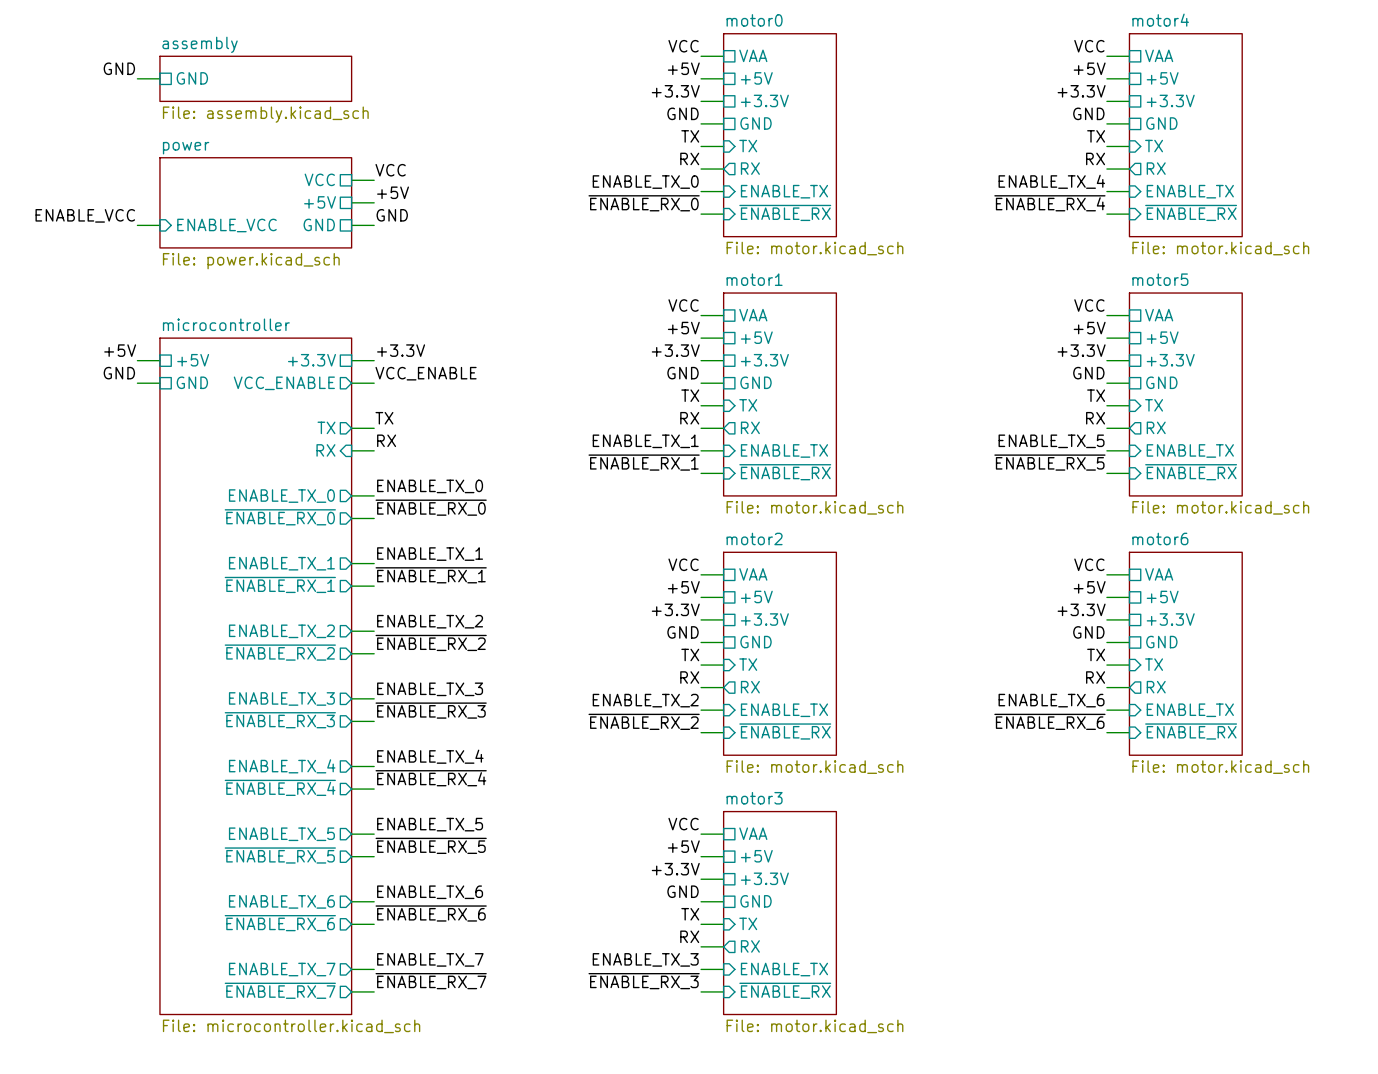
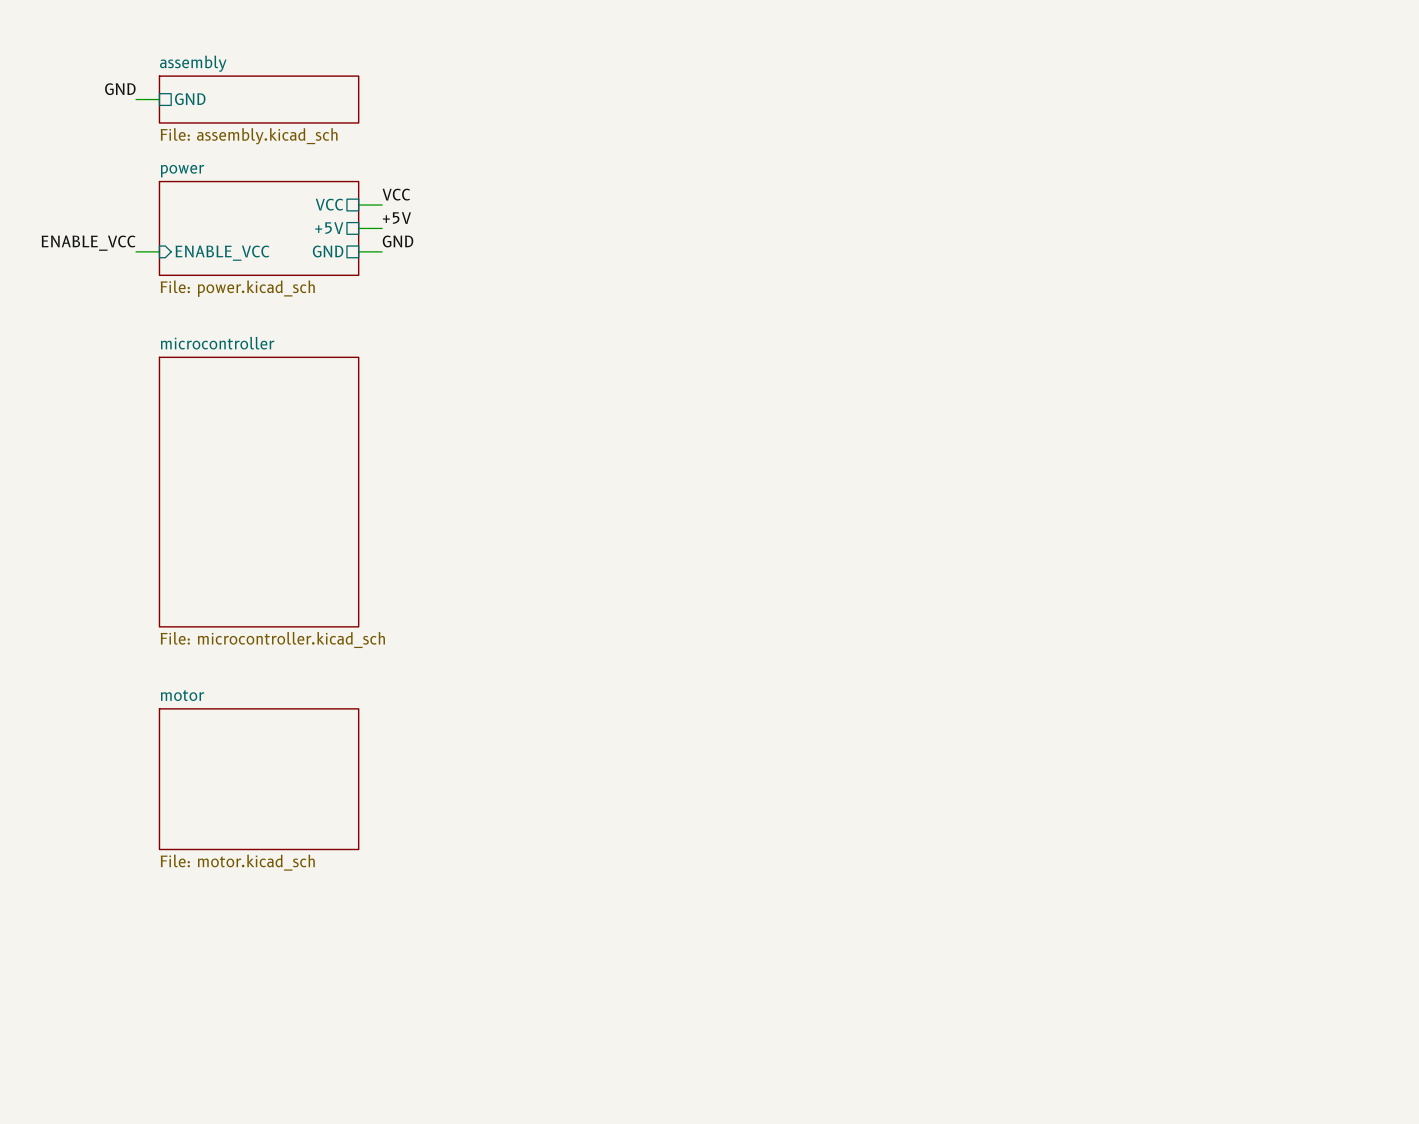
label: VCC (683, 46) -> none
label: VCC (1089, 46) -> none
sheet pin: VAA (753, 55) -> none
sheet pin: VAA (1159, 55) -> none
wire: (701, 56) (723, 56) -> none
wire: (1106, 56) (1129, 56) -> none
label: +5V (683, 68) -> none
label: +5V (1089, 68) -> none
wire: (701, 78) (723, 78) -> none
sheet pin: +5V (756, 78) -> none
wire: (1106, 78) (1129, 78) -> none
sheet pin: +5V (1162, 78) -> none
label: +3.3V (675, 91) -> none
label: +3.3V (1081, 91) -> none
sheet pin: +3.3V (764, 100) -> none
sheet pin: +3.3V (1170, 100) -> none
wire: (701, 101) (723, 101) -> none
wire: (1106, 101) (1129, 101) -> none
label: GND (683, 113) -> none
label: GND (1088, 113) -> none
wire: (701, 123) (723, 123) -> none
sheet pin: GND (756, 123) -> none
wire: (1106, 123) (1129, 123) -> none
sheet pin: GND (1161, 123) -> none
sheet motor0: File: motor.kicad_sch (779, 135) -> none
sheet motor4: File: motor.kicad_sch (1185, 135) -> none
label: TX (690, 136) -> none
label: TX (1096, 136) -> none
wire: (701, 146) (723, 146) -> none
sheet pin: TX (748, 146) -> none
wire: (1106, 146) (1129, 146) -> none
sheet pin: TX (1154, 146) -> none
label: RX (689, 158) -> none
label: RX (1095, 158) -> none
sheet pin: RX (750, 168) -> none
sheet pin: RX (1156, 168) -> none
wire: (701, 169) (723, 169) -> none
wire: (1106, 169) (1129, 169) -> none
label: ENABLE_TX_4 (1051, 181) -> none
label: ENABLE_TX_0 (645, 182) -> none
wire: (701, 191) (723, 191) -> none
sheet pin: ENABLE_TX (784, 191) -> none
wire: (1106, 191) (1129, 191) -> none
sheet pin: ENABLE_TX (1190, 191) -> none
label: ~{ENABLE_RX_0} (644, 203) -> none
label: ~{ENABLE_RX_4} (1049, 203) -> none
sheet pin: ~{ENABLE_RX} (785, 212) -> none
sheet pin: ~{ENABLE_RX} (1191, 212) -> none
wire: (701, 214) (723, 214) -> none
wire: (1106, 214) (1129, 214) -> none
label: VCC (683, 305) -> none
label: VCC (1089, 305) -> none
wire: (701, 315) (723, 315) -> none
sheet pin: VAA (753, 315) -> none
wire: (1106, 315) (1129, 315) -> none
sheet pin: VAA (1159, 315) -> none
label: +5V (683, 328) -> none
label: +5V (1089, 328) -> none
sheet pin: +5V (756, 337) -> none
sheet pin: +5V (1162, 337) -> none
wire: (701, 338) (723, 338) -> none
wire: (1106, 338) (1129, 338) -> none
label: +5V (120, 350) -> none
label: +3.3V (401, 350) -> none
label: +3.3V (675, 350) -> none
label: +3.3V (1081, 350) -> none
wire: (137, 360) (159, 360) -> none
sheet pin: +5V (193, 360) -> none
sheet pin: +3.3V (311, 360) -> none
wire: (351, 360) (374, 360) -> none
wire: (701, 360) (723, 360) -> none
sheet pin: +3.3V (764, 360) -> none
wire: (1106, 360) (1129, 360) -> none
sheet pin: +3.3V (1170, 360) -> none
label: GND (119, 373) -> none
label: VCC_ENABLE (426, 373) -> none
label: GND (683, 373) -> none
label: GND (1088, 373) -> none
sheet pin: GND (192, 382) -> none
sheet pin: GND (756, 382) -> none
sheet pin: GND (1161, 382) -> none
wire: (137, 383) (159, 383) -> none
sheet pin: VCC_ENABLE (284, 383) -> none
wire: (351, 383) (374, 383) -> none
wire: (701, 383) (723, 383) -> none
wire: (1106, 383) (1129, 383) -> none
sheet motor1: File: motor.kicad_sch (779, 394) -> none
sheet motor5: File: motor.kicad_sch (1185, 394) -> none
label: TX (690, 395) -> none
label: TX (1096, 395) -> none
wire: (701, 405) (723, 405) -> none
sheet pin: TX (748, 405) -> none
wire: (1106, 405) (1129, 405) -> none
sheet pin: TX (1154, 405) -> none
label: TX (384, 418) -> none
label: RX (689, 418) -> none
label: RX (1095, 418) -> none
sheet pin: TX (326, 427) -> none
sheet pin: RX (750, 427) -> none
sheet pin: RX (1156, 427) -> none
wire: (351, 428) (374, 428) -> none
wire: (701, 428) (723, 428) -> none
wire: (1106, 428) (1129, 428) -> none
label: RX (386, 440) -> none
label: ENABLE_TX_1 (645, 441) -> none
label: ENABLE_TX_5 (1051, 441) -> none
sheet pin: RX (325, 450) -> none
wire: (351, 450) (374, 450) -> none
wire: (701, 450) (723, 450) -> none
sheet pin: ENABLE_TX (784, 450) -> none
wire: (1106, 450) (1129, 450) -> none
sheet pin: ENABLE_TX (1190, 450) -> none
sheet microcontroller: none -> File: microcontroller.kicad_sch (259, 492)
label: ~{ENABLE_RX_1} (644, 462) -> none
label: ~{ENABLE_RX_5} (1049, 462) -> none
sheet pin: ~{ENABLE_RX} (785, 472) -> none
sheet pin: ~{ENABLE_RX} (1191, 472) -> none
wire: (701, 473) (723, 473) -> none
wire: (1106, 473) (1129, 473) -> none
label: ENABLE_TX_0 (430, 486) -> none
wire: (351, 495) (374, 495) -> none
sheet pin: ENABLE_TX_0 (281, 496) -> none
label: ~{ENABLE_RX_0} (431, 507) -> none
sheet pin: ~{ENABLE_RX_0} (280, 517) -> none
wire: (351, 518) (374, 518) -> none
label: ENABLE_TX_1 (430, 554) -> none
sheet pin: ENABLE_TX_1 (281, 563) -> none
wire: (351, 563) (374, 563) -> none
label: VCC (683, 564) -> none
label: VCC (1089, 564) -> none
wire: (701, 574) (723, 574) -> none
sheet pin: VAA (753, 574) -> none
wire: (1106, 574) (1129, 574) -> none
sheet pin: VAA (1159, 574) -> none
label: ~{ENABLE_RX_1} (431, 575) -> none
sheet pin: ~{ENABLE_RX_1} (280, 584) -> none
wire: (351, 586) (374, 586) -> none
label: +5V (683, 587) -> none
label: +5V (1089, 587) -> none
sheet pin: +5V (756, 596) -> none
sheet pin: +5V (1162, 596) -> none
wire: (701, 597) (723, 597) -> none
wire: (1106, 597) (1129, 597) -> none
label: +3.3V (675, 609) -> none
label: +3.3V (1081, 609) -> none
wire: (701, 619) (723, 619) -> none
sheet pin: +3.3V (764, 619) -> none
wire: (1106, 619) (1129, 619) -> none
sheet pin: +3.3V (1170, 619) -> none
label: ENABLE_TX_2 (430, 621) -> none
sheet pin: ENABLE_TX_2 (281, 631) -> none
wire: (351, 631) (374, 631) -> none
label: GND (683, 632) -> none
label: GND (1088, 632) -> none
label: ~{ENABLE_RX_2} (431, 642) -> none
wire: (701, 642) (723, 642) -> none
sheet pin: GND (756, 642) -> none
wire: (1106, 642) (1129, 642) -> none
sheet pin: GND (1161, 642) -> none
sheet pin: ~{ENABLE_RX_2} (280, 652) -> none
wire: (351, 653) (374, 653) -> none
sheet motor2: File: motor.kicad_sch (779, 653) -> none
sheet motor6: File: motor.kicad_sch (1185, 653) -> none
label: TX (690, 654) -> none
label: TX (1096, 654) -> none
sheet pin: TX (748, 664) -> none
sheet pin: TX (1154, 664) -> none
wire: (701, 665) (723, 665) -> none
wire: (1106, 665) (1129, 665) -> none
sheet microcontroller: File: microcontroller.kicad_sch (255, 676) -> none
label: RX (689, 677) -> none
label: RX (1095, 677) -> none
wire: (701, 687) (723, 687) -> none
sheet pin: RX (750, 687) -> none
wire: (1106, 687) (1129, 687) -> none
sheet pin: RX (1156, 687) -> none
label: ENABLE_TX_3 (430, 689) -> none
sheet pin: ENABLE_TX_3 (281, 698) -> none
wire: (351, 698) (374, 698) -> none
label: ENABLE_TX_2 (645, 700) -> none
label: ENABLE_TX_6 (1051, 700) -> none
label: ~{ENABLE_RX_3} (431, 710) -> none
wire: (701, 710) (723, 710) -> none
sheet pin: ENABLE_TX (784, 710) -> none
wire: (1106, 710) (1129, 710) -> none
sheet pin: ENABLE_TX (1190, 710) -> none
sheet pin: ~{ENABLE_RX_3} (280, 720) -> none
wire: (351, 721) (374, 721) -> none
label: ~{ENABLE_RX_2} (644, 721) -> none
label: ~{ENABLE_RX_6} (1049, 721) -> none
sheet pin: ~{ENABLE_RX} (785, 731) -> none
sheet pin: ~{ENABLE_RX} (1191, 731) -> none
sheet motor: none -> File: motor.kicad_sch (259, 779)
wire: (701, 732) (723, 732) -> none
wire: (1106, 732) (1129, 732) -> none
label: ENABLE_TX_4 (430, 756) -> none
sheet pin: ENABLE_TX_4 (282, 766) -> none
wire: (351, 766) (374, 766) -> none
label: ~{ENABLE_RX_4} (431, 778) -> none
sheet pin: ~{ENABLE_RX_4} (280, 787) -> none
wire: (351, 789) (374, 789) -> none
label: ENABLE_TX_5 (430, 824) -> none
label: VCC (683, 824) -> none
sheet pin: VAA (753, 833) -> none
sheet pin: ENABLE_TX_5 (281, 834) -> none
wire: (351, 834) (374, 834) -> none
wire: (701, 834) (723, 834) -> none
label: ~{ENABLE_RX_5} (431, 845) -> none
label: +5V (683, 846) -> none
sheet pin: ~{ENABLE_RX_5} (280, 855) -> none
wire: (351, 856) (374, 856) -> none
wire: (701, 856) (723, 856) -> none
sheet pin: +5V (756, 856) -> none
label: +3.3V (675, 869) -> none
sheet pin: +3.3V (764, 878) -> none
wire: (701, 879) (723, 879) -> none
label: GND (683, 891) -> none
label: ENABLE_TX_6 (430, 892) -> none
sheet pin: ENABLE_TX_6 (281, 901) -> none
wire: (351, 901) (374, 901) -> none
wire: (701, 901) (723, 901) -> none
sheet pin: GND (756, 901) -> none
label: ~{ENABLE_RX_6} (431, 913) -> none
sheet motor3: File: motor.kicad_sch (779, 913) -> none
label: TX (690, 914) -> none
sheet pin: ~{ENABLE_RX_6} (280, 923) -> none
sheet pin: TX (748, 923) -> none
wire: (351, 924) (374, 924) -> none
wire: (701, 924) (723, 924) -> none
label: RX (689, 936) -> none
wire: (701, 946) (723, 946) -> none
sheet pin: RX (750, 946) -> none
label: ENABLE_TX_7 (430, 959) -> none
label: ENABLE_TX_3 (645, 959) -> none
sheet pin: ENABLE_TX_7 (282, 969) -> none
wire: (351, 969) (374, 969) -> none
wire: (701, 969) (723, 969) -> none
sheet pin: ENABLE_TX (784, 969) -> none
label: ~{ENABLE_RX_7} (431, 981) -> none
label: ~{ENABLE_RX_3} (644, 981) -> none
sheet pin: ~{ENABLE_RX_7} (280, 990) -> none
sheet pin: ~{ENABLE_RX} (785, 990) -> none
wire: (351, 991) (374, 991) -> none
wire: (701, 991) (723, 991) -> none

